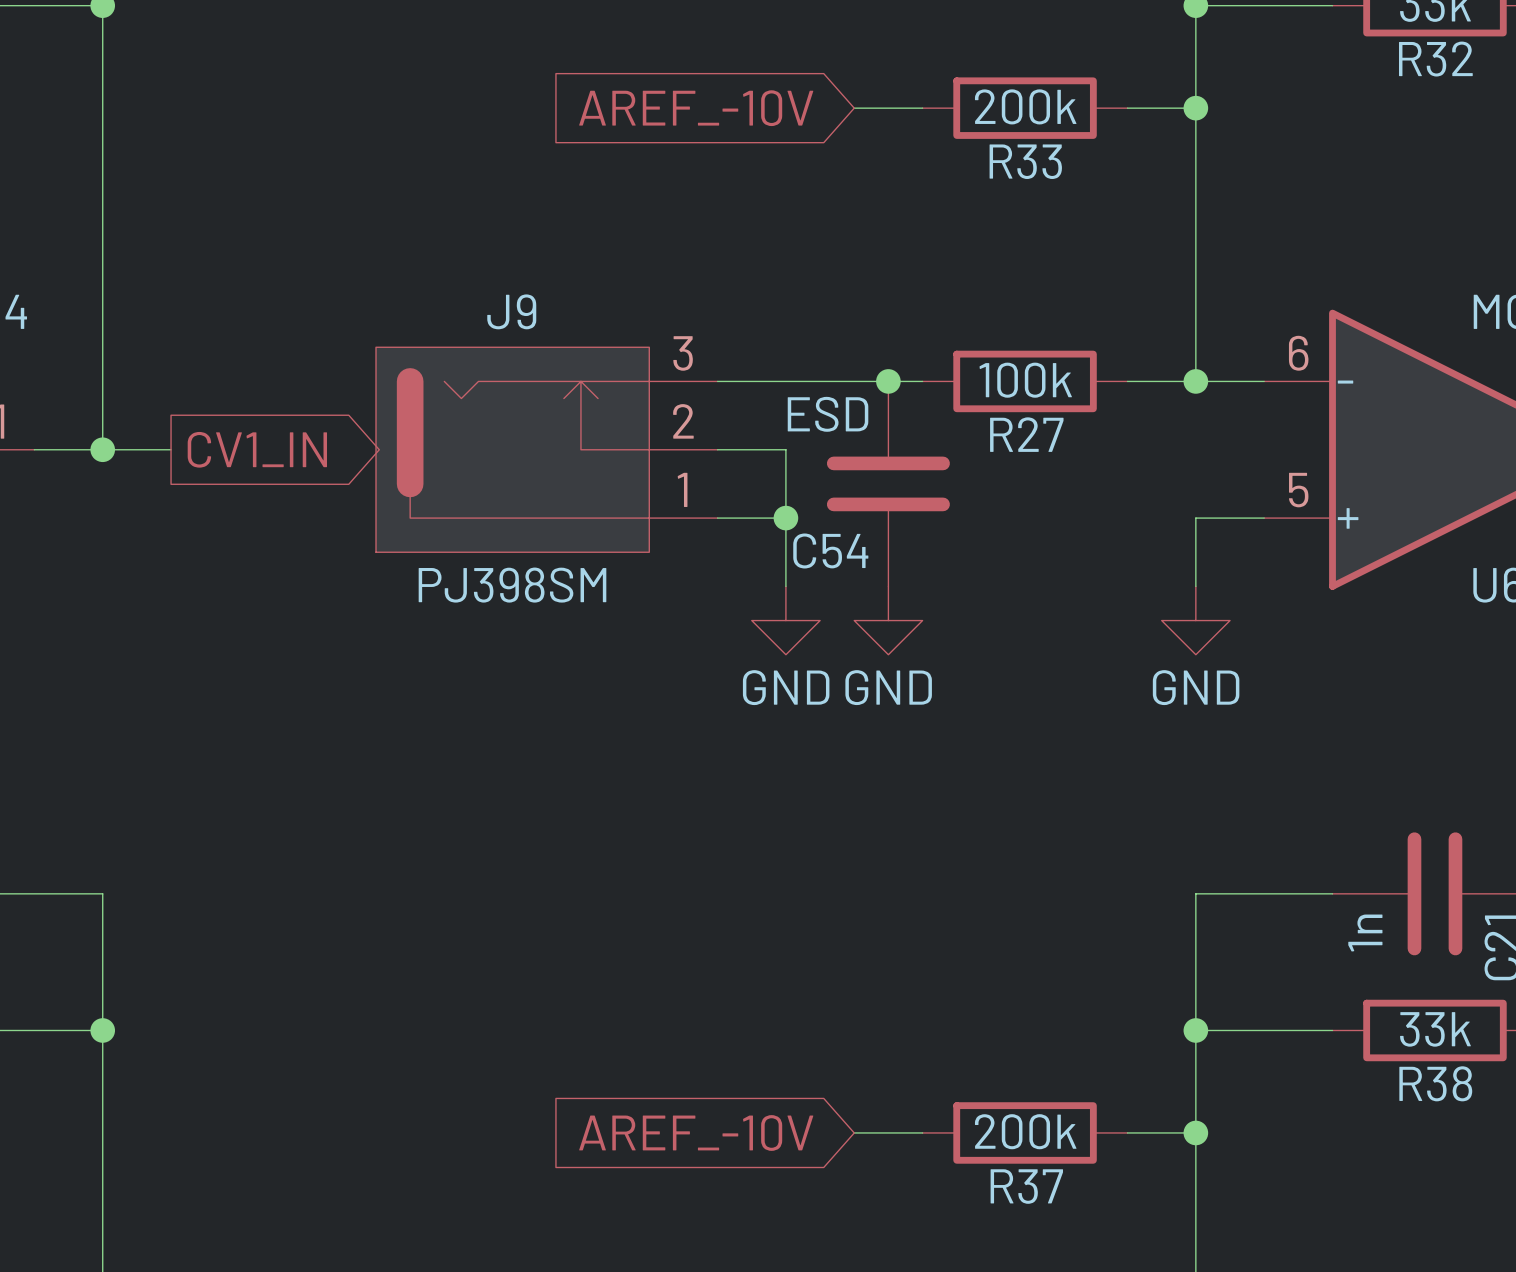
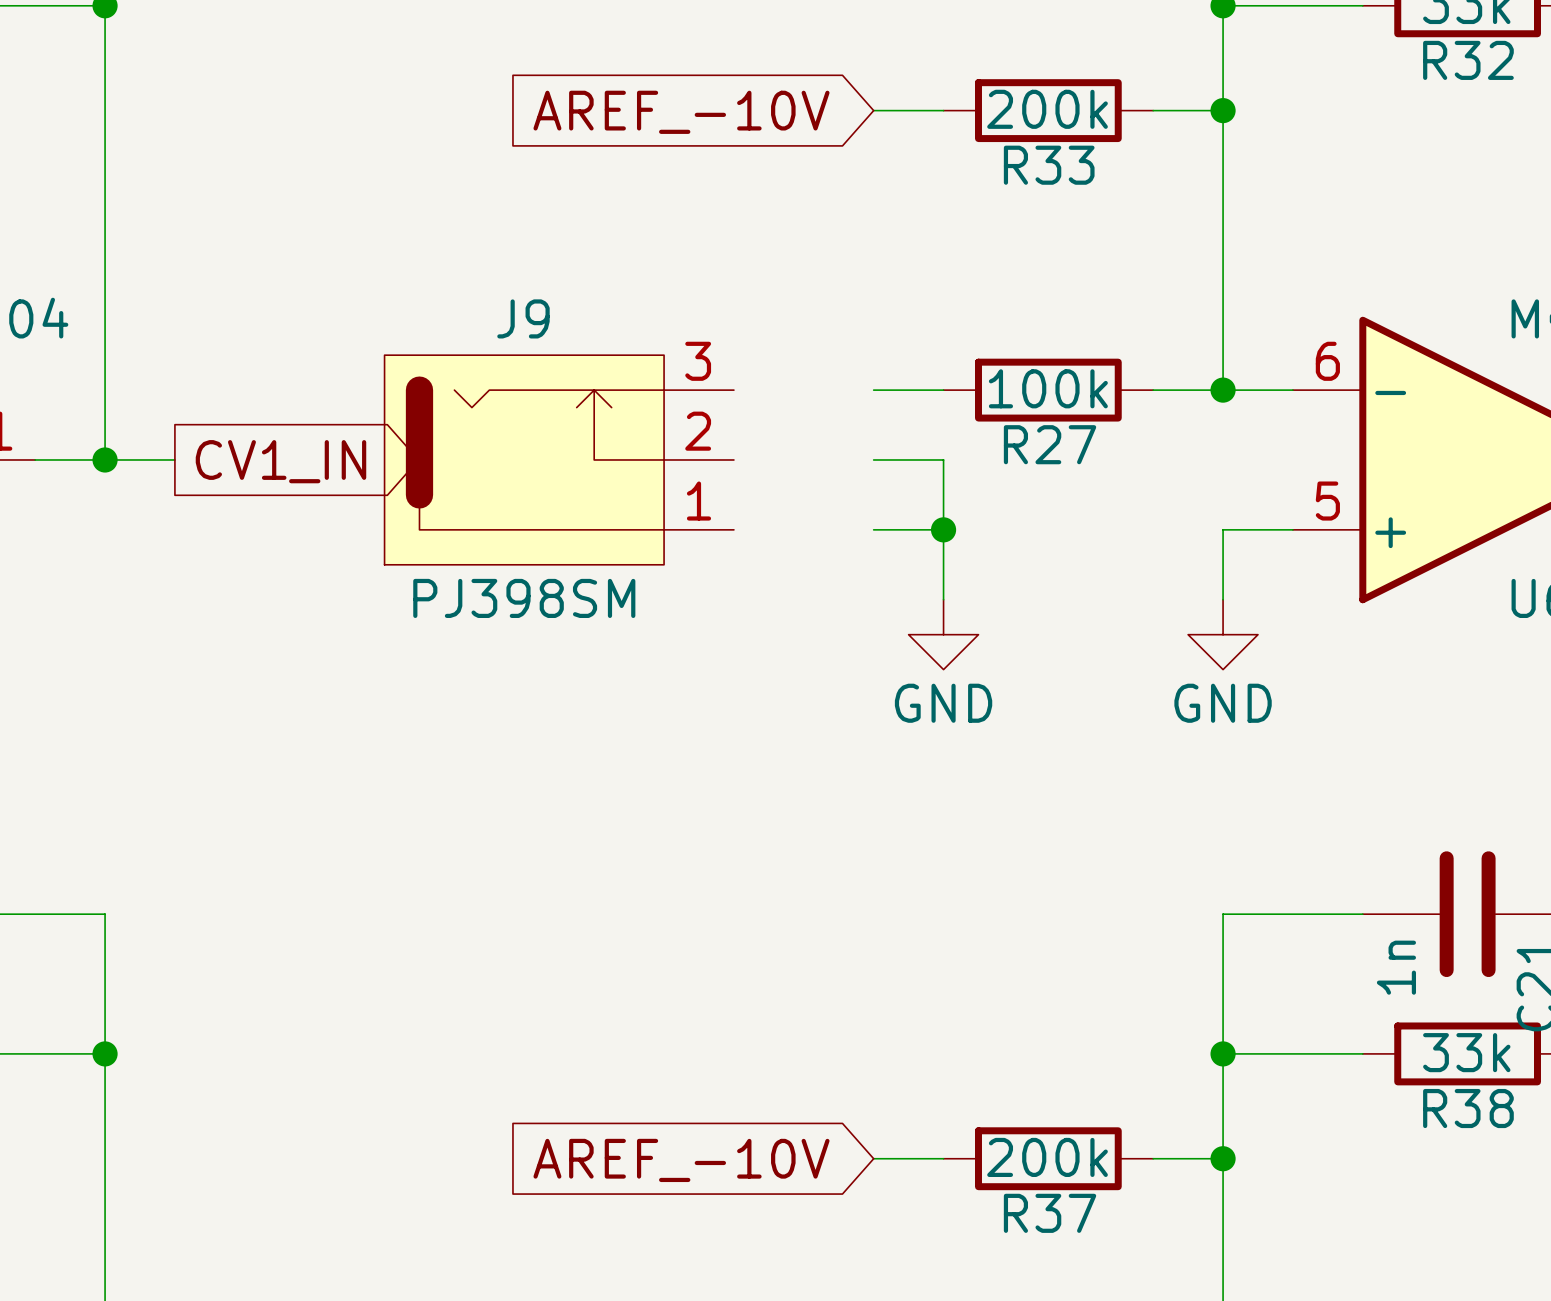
wire: (717, 381) (854, 381) -> none
junction: (888, 381) -> none
wire: (717, 449) (785, 449) (785, 586) -> (873, 459) (943, 459) (943, 599)
C54: ESD (888, 483) -> none
wire: (717, 518) (785, 518) -> (873, 529) (943, 529)
junction: (785, 518) -> none
junction: none -> (943, 529)
power symbol: GND (785, 620) -> none
power symbol position: GND (888, 620) -> GND (943, 634)

